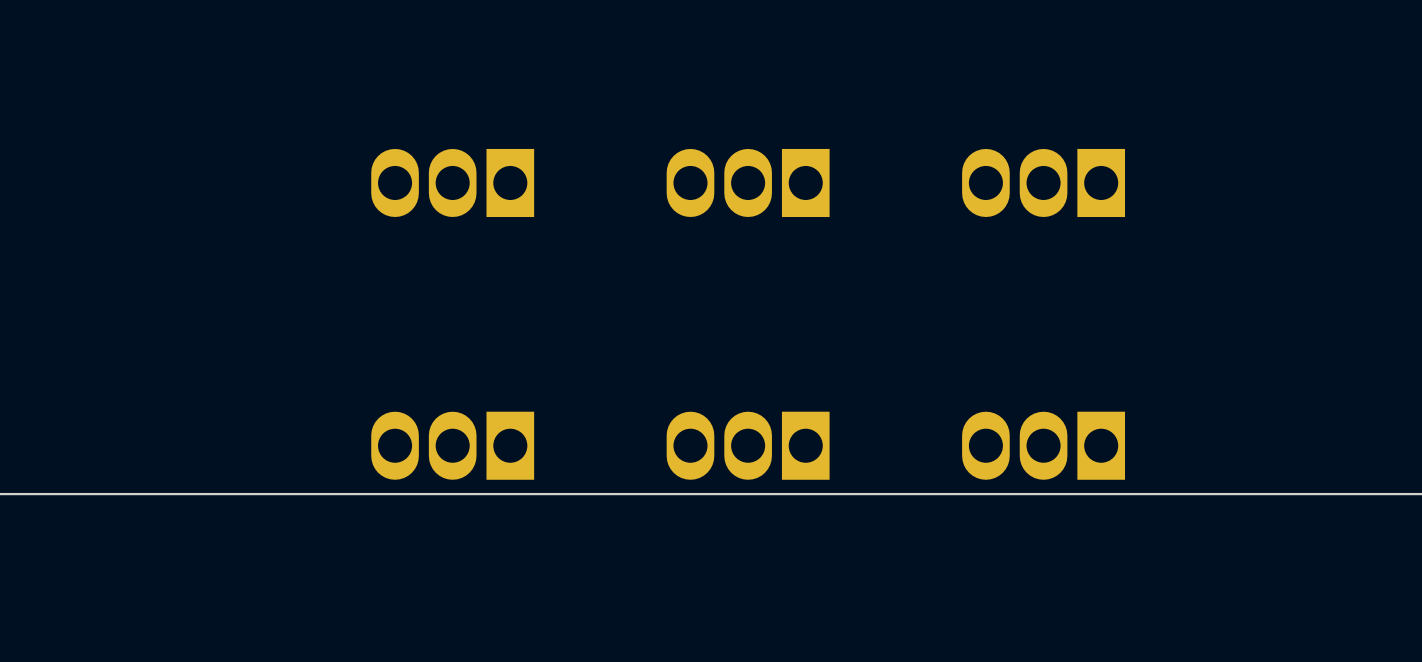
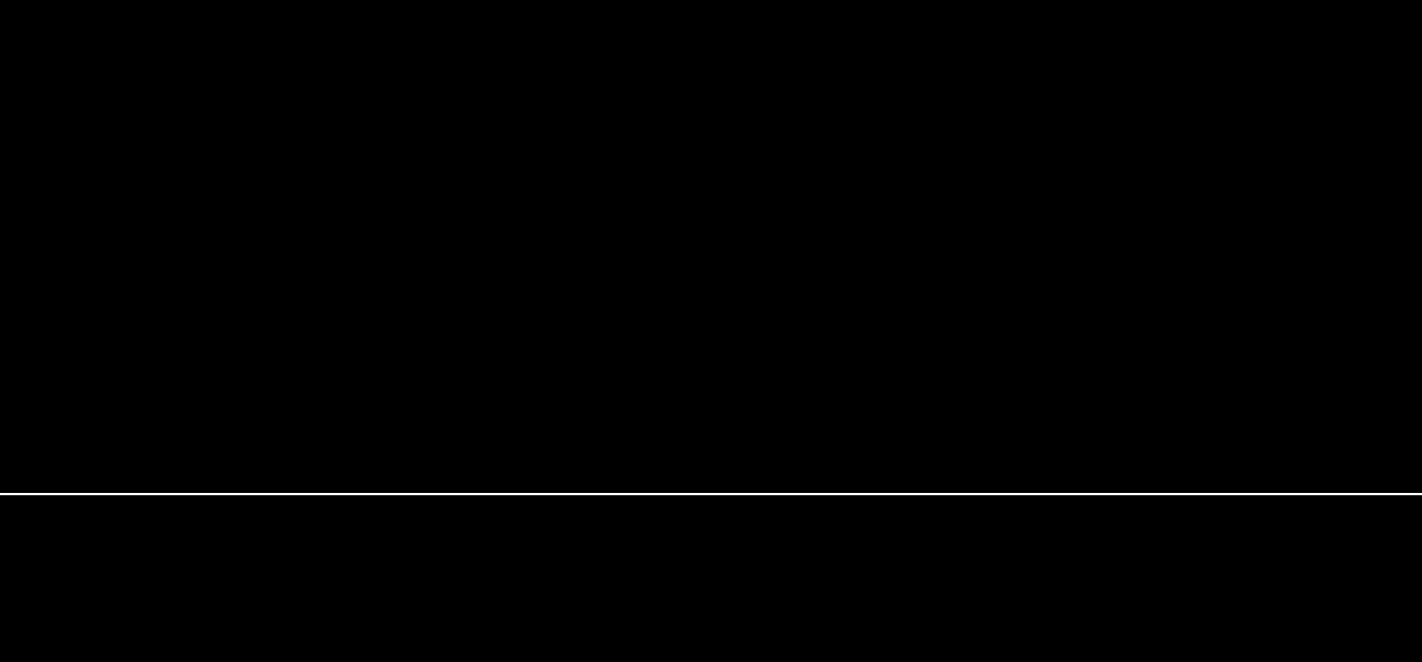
part: (452, 182) -> none
part: (748, 182) -> none
part: (1043, 182) -> none
part: (452, 445) -> none
part: (748, 445) -> none
part: (1043, 445) -> none

